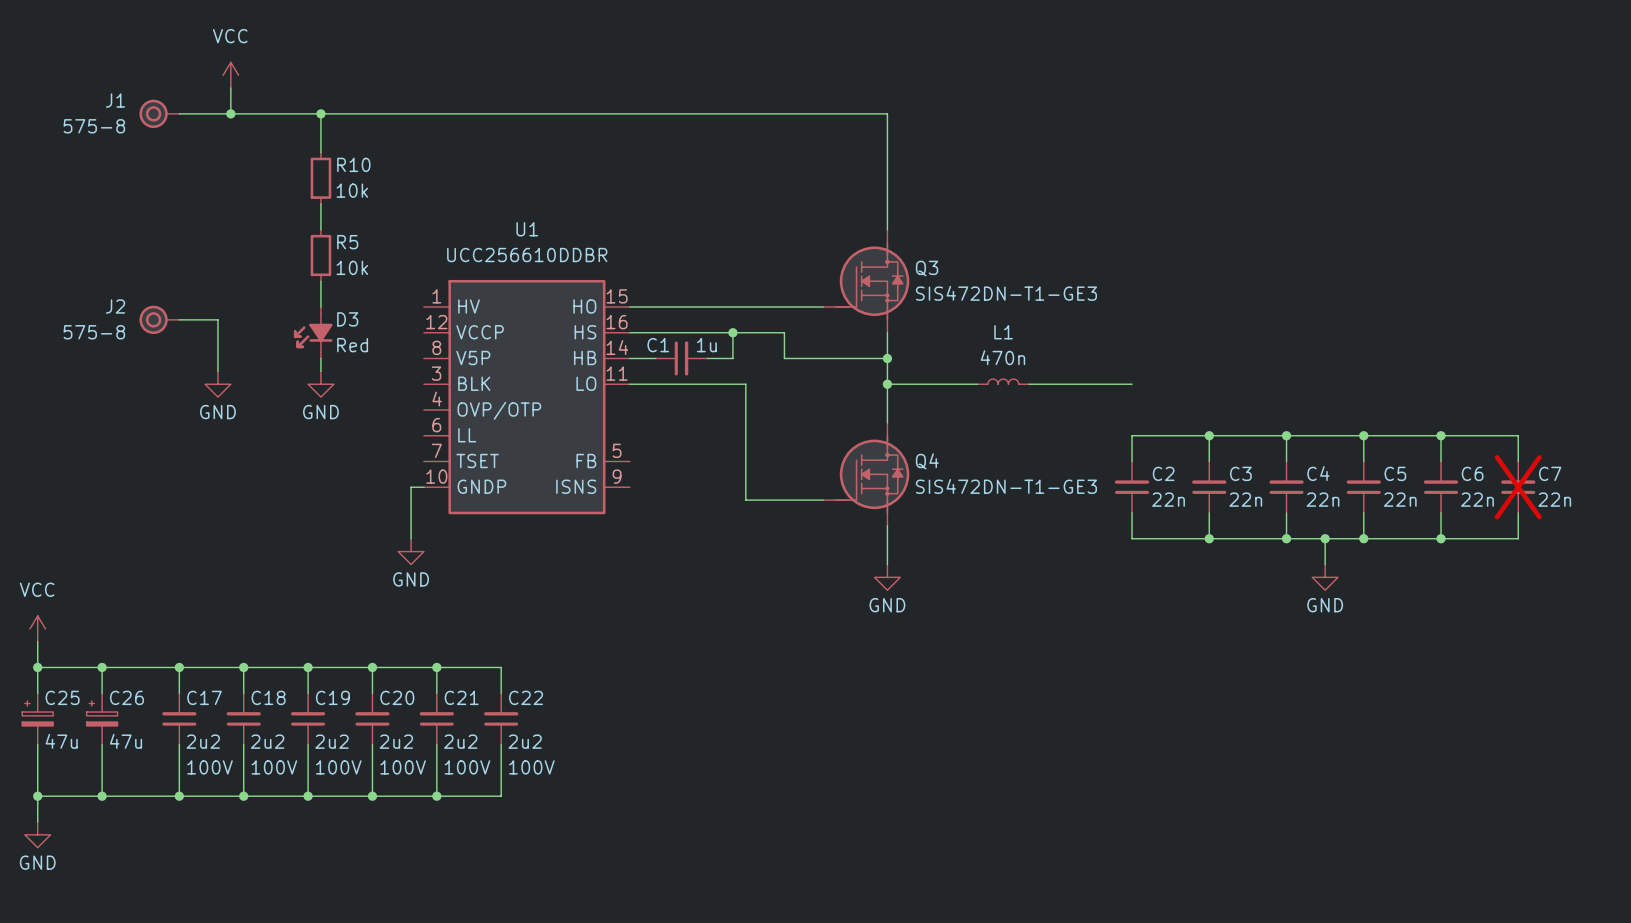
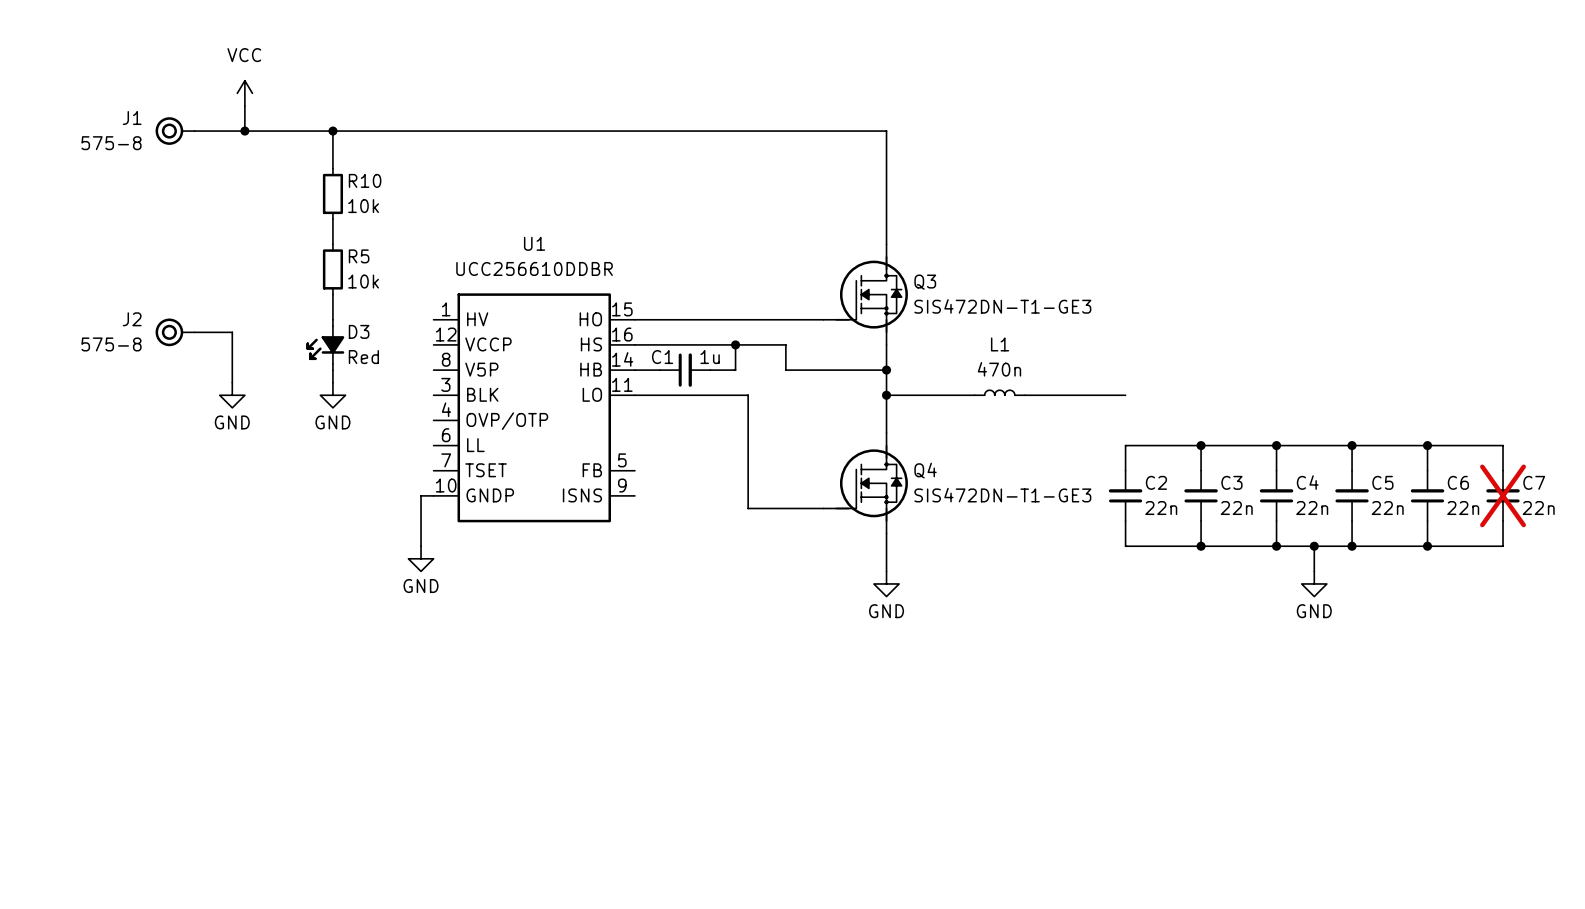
power symbol: VCC (37, 628) -> none
wire: (37, 641) (37, 693) -> none
wire: (37, 667) (501, 667) (501, 693) -> none
junction: (37, 667) -> none
wire: (102, 667) (102, 693) -> none
junction: (102, 667) -> none
wire: (179, 667) (179, 693) -> none
junction: (179, 667) -> none
wire: (243, 667) (243, 693) -> none
junction: (243, 667) -> none
wire: (308, 667) (308, 693) -> none
junction: (308, 667) -> none
wire: (372, 667) (372, 693) -> none
junction: (372, 667) -> none
wire: (436, 667) (436, 693) -> none
junction: (436, 667) -> none
C25: (37, 718) -> none
C26: (102, 718) -> none
C17: (179, 718) -> none
C18: (243, 718) -> none
C19: (308, 718) -> none
C20: (372, 718) -> none
C21: (436, 718) -> none
C22: (501, 718) -> none
wire: (37, 744) (37, 821) -> none
wire: (102, 744) (102, 796) -> none
wire: (179, 744) (179, 796) -> none
wire: (243, 744) (243, 796) -> none
wire: (308, 744) (308, 796) -> none
wire: (372, 744) (372, 796) -> none
wire: (436, 744) (436, 796) -> none
wire: (501, 744) (501, 796) (37, 796) -> none
junction: (37, 796) -> none
junction: (102, 796) -> none
junction: (179, 796) -> none
junction: (243, 796) -> none
junction: (308, 796) -> none
junction: (372, 796) -> none
junction: (436, 796) -> none
power symbol: GND (37, 834) -> none

